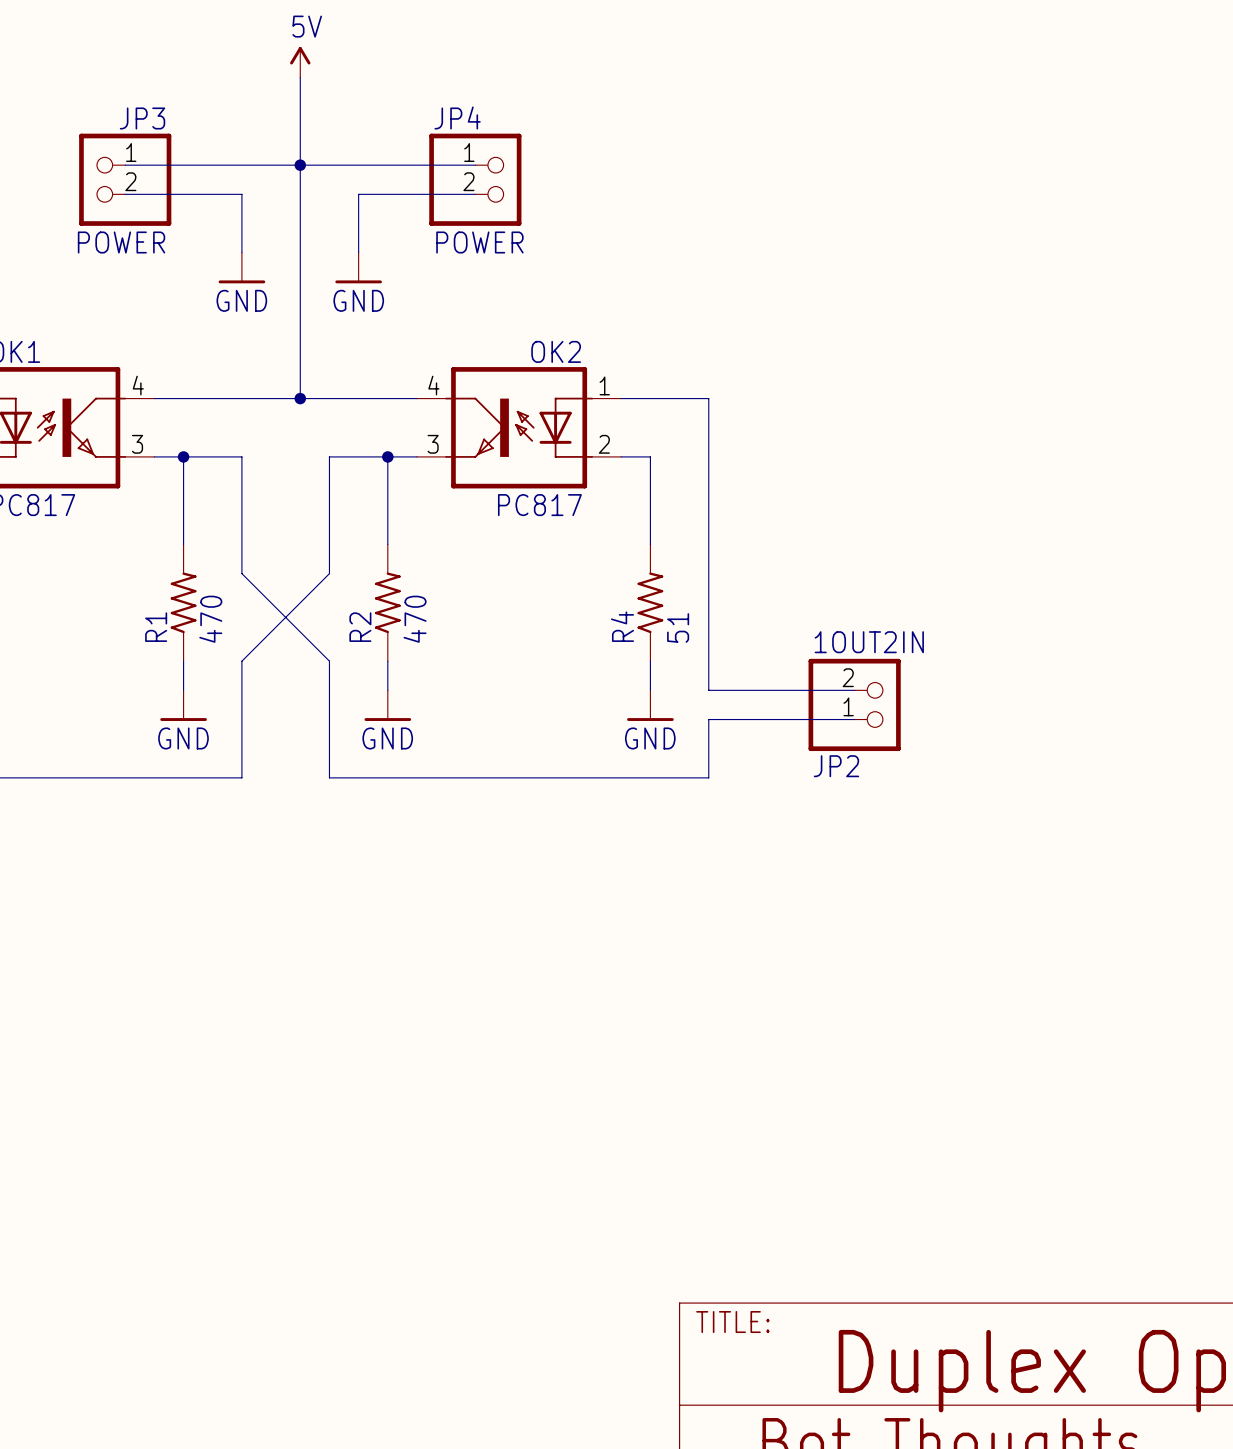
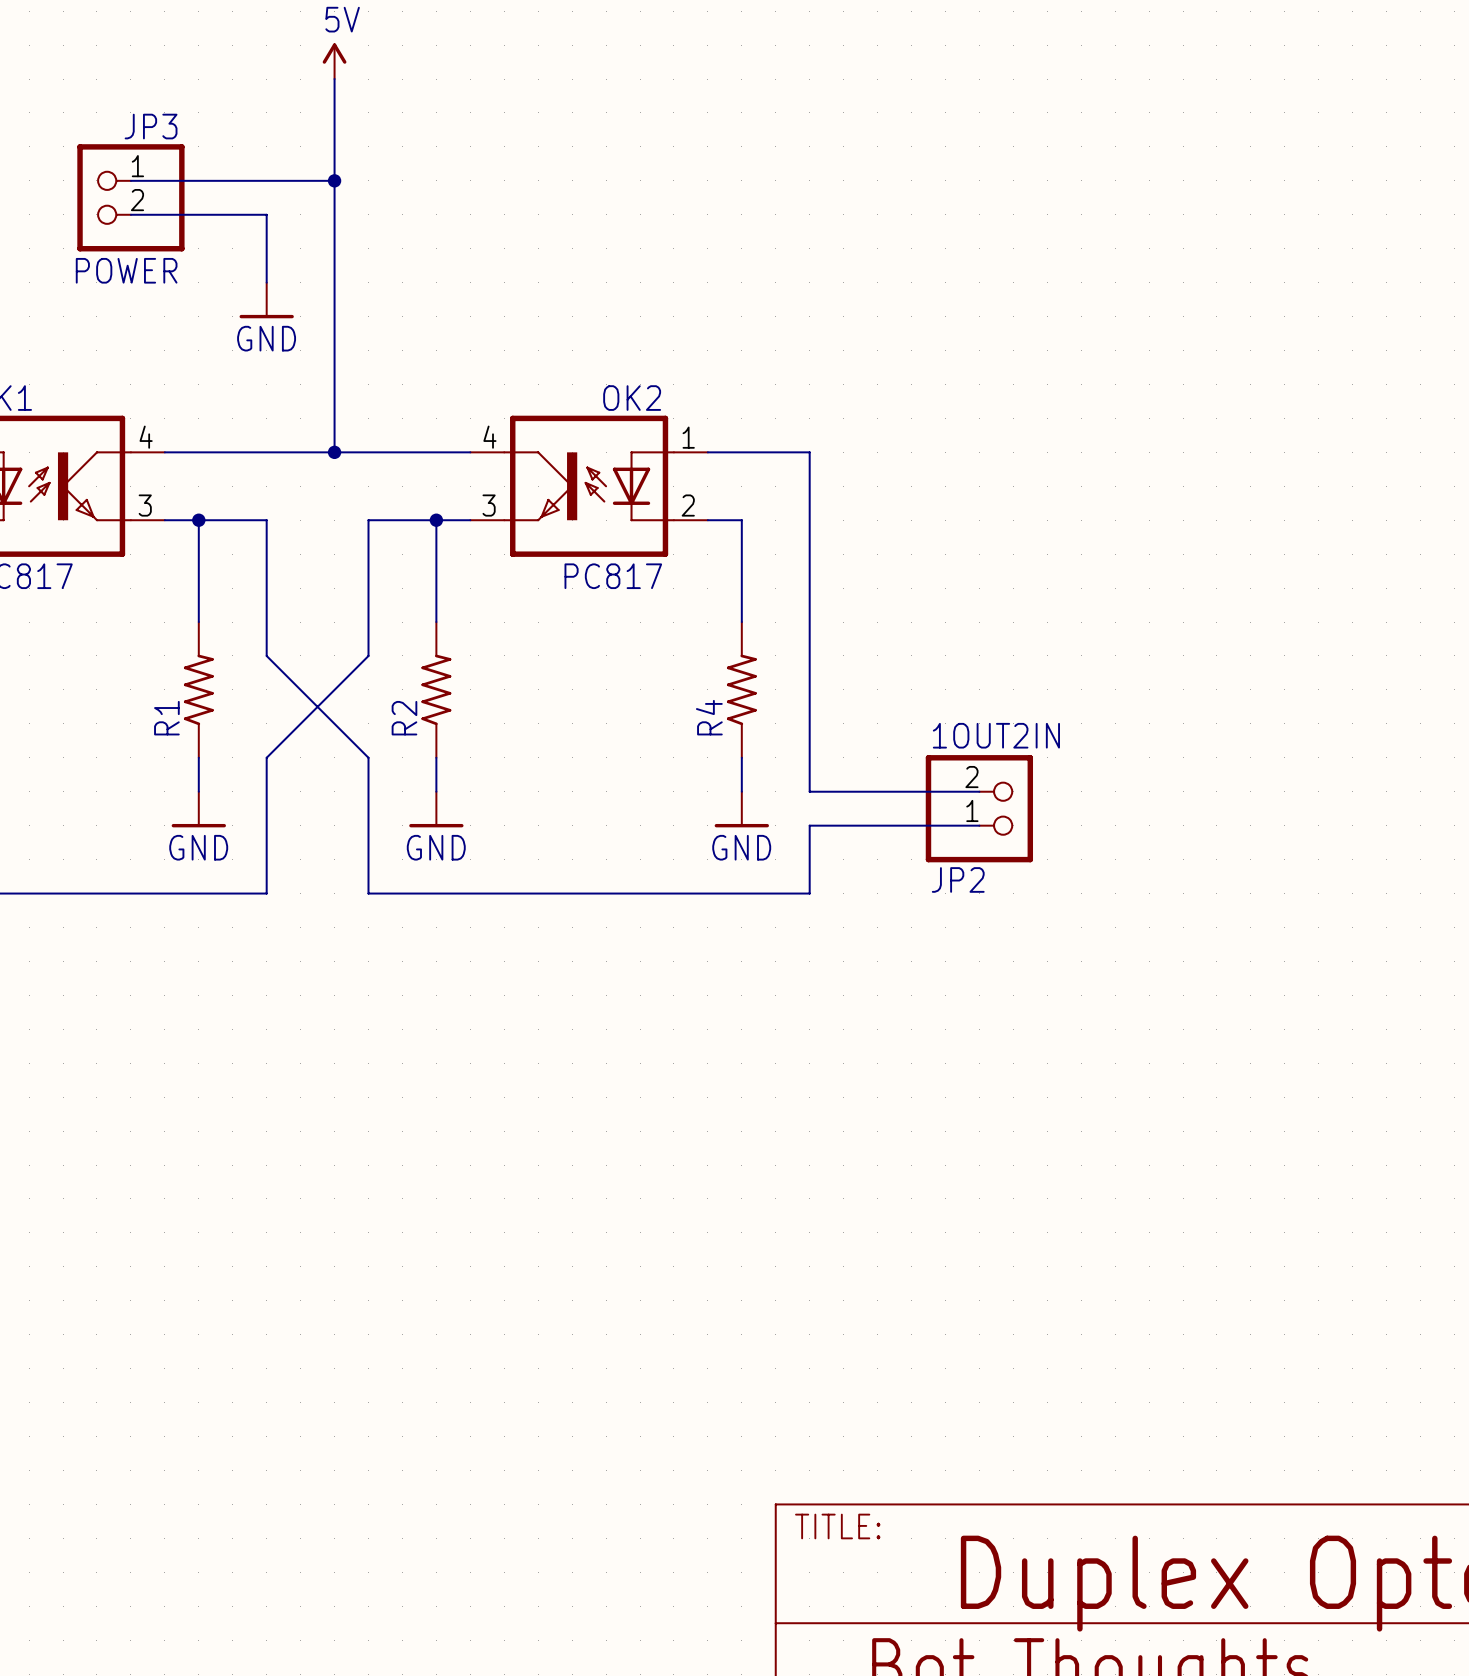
wire: (300, 165) (475, 165) -> none
JP4: POWER (475, 179) -> none
wire: (475, 194) (358, 194) (358, 252) -> none
power symbol: GND (358, 268) -> none
R1 value: 470 (210, 619) -> none
R2 value: 470 (415, 619) -> none
R4 value: 51 (678, 628) -> none

